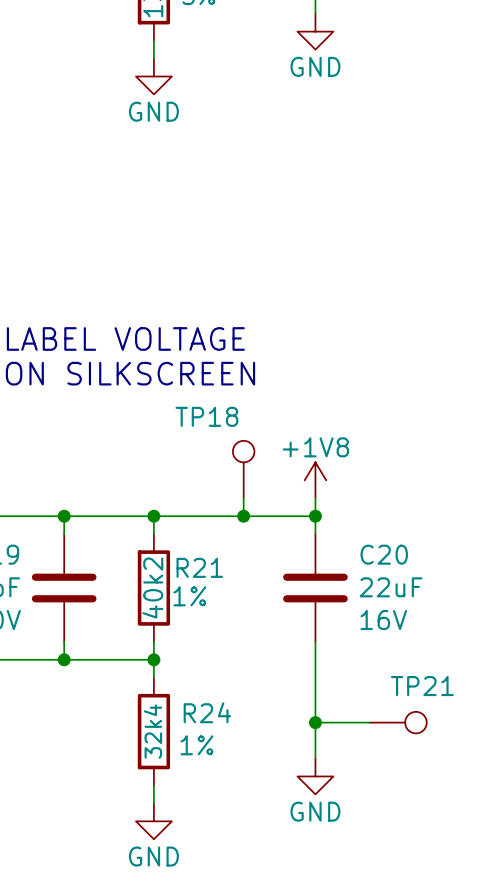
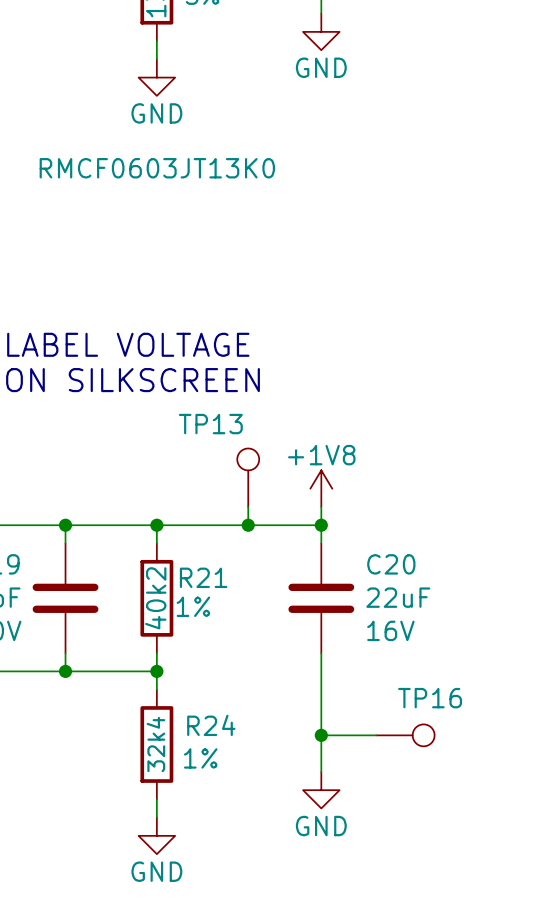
part value: none -> RMCF0603JT13K0 (157, 168)
TP18 name: TP18 (206, 416) -> TP13 (210, 424)
TP21 name: TP21 (422, 686) -> TP16 (430, 698)

